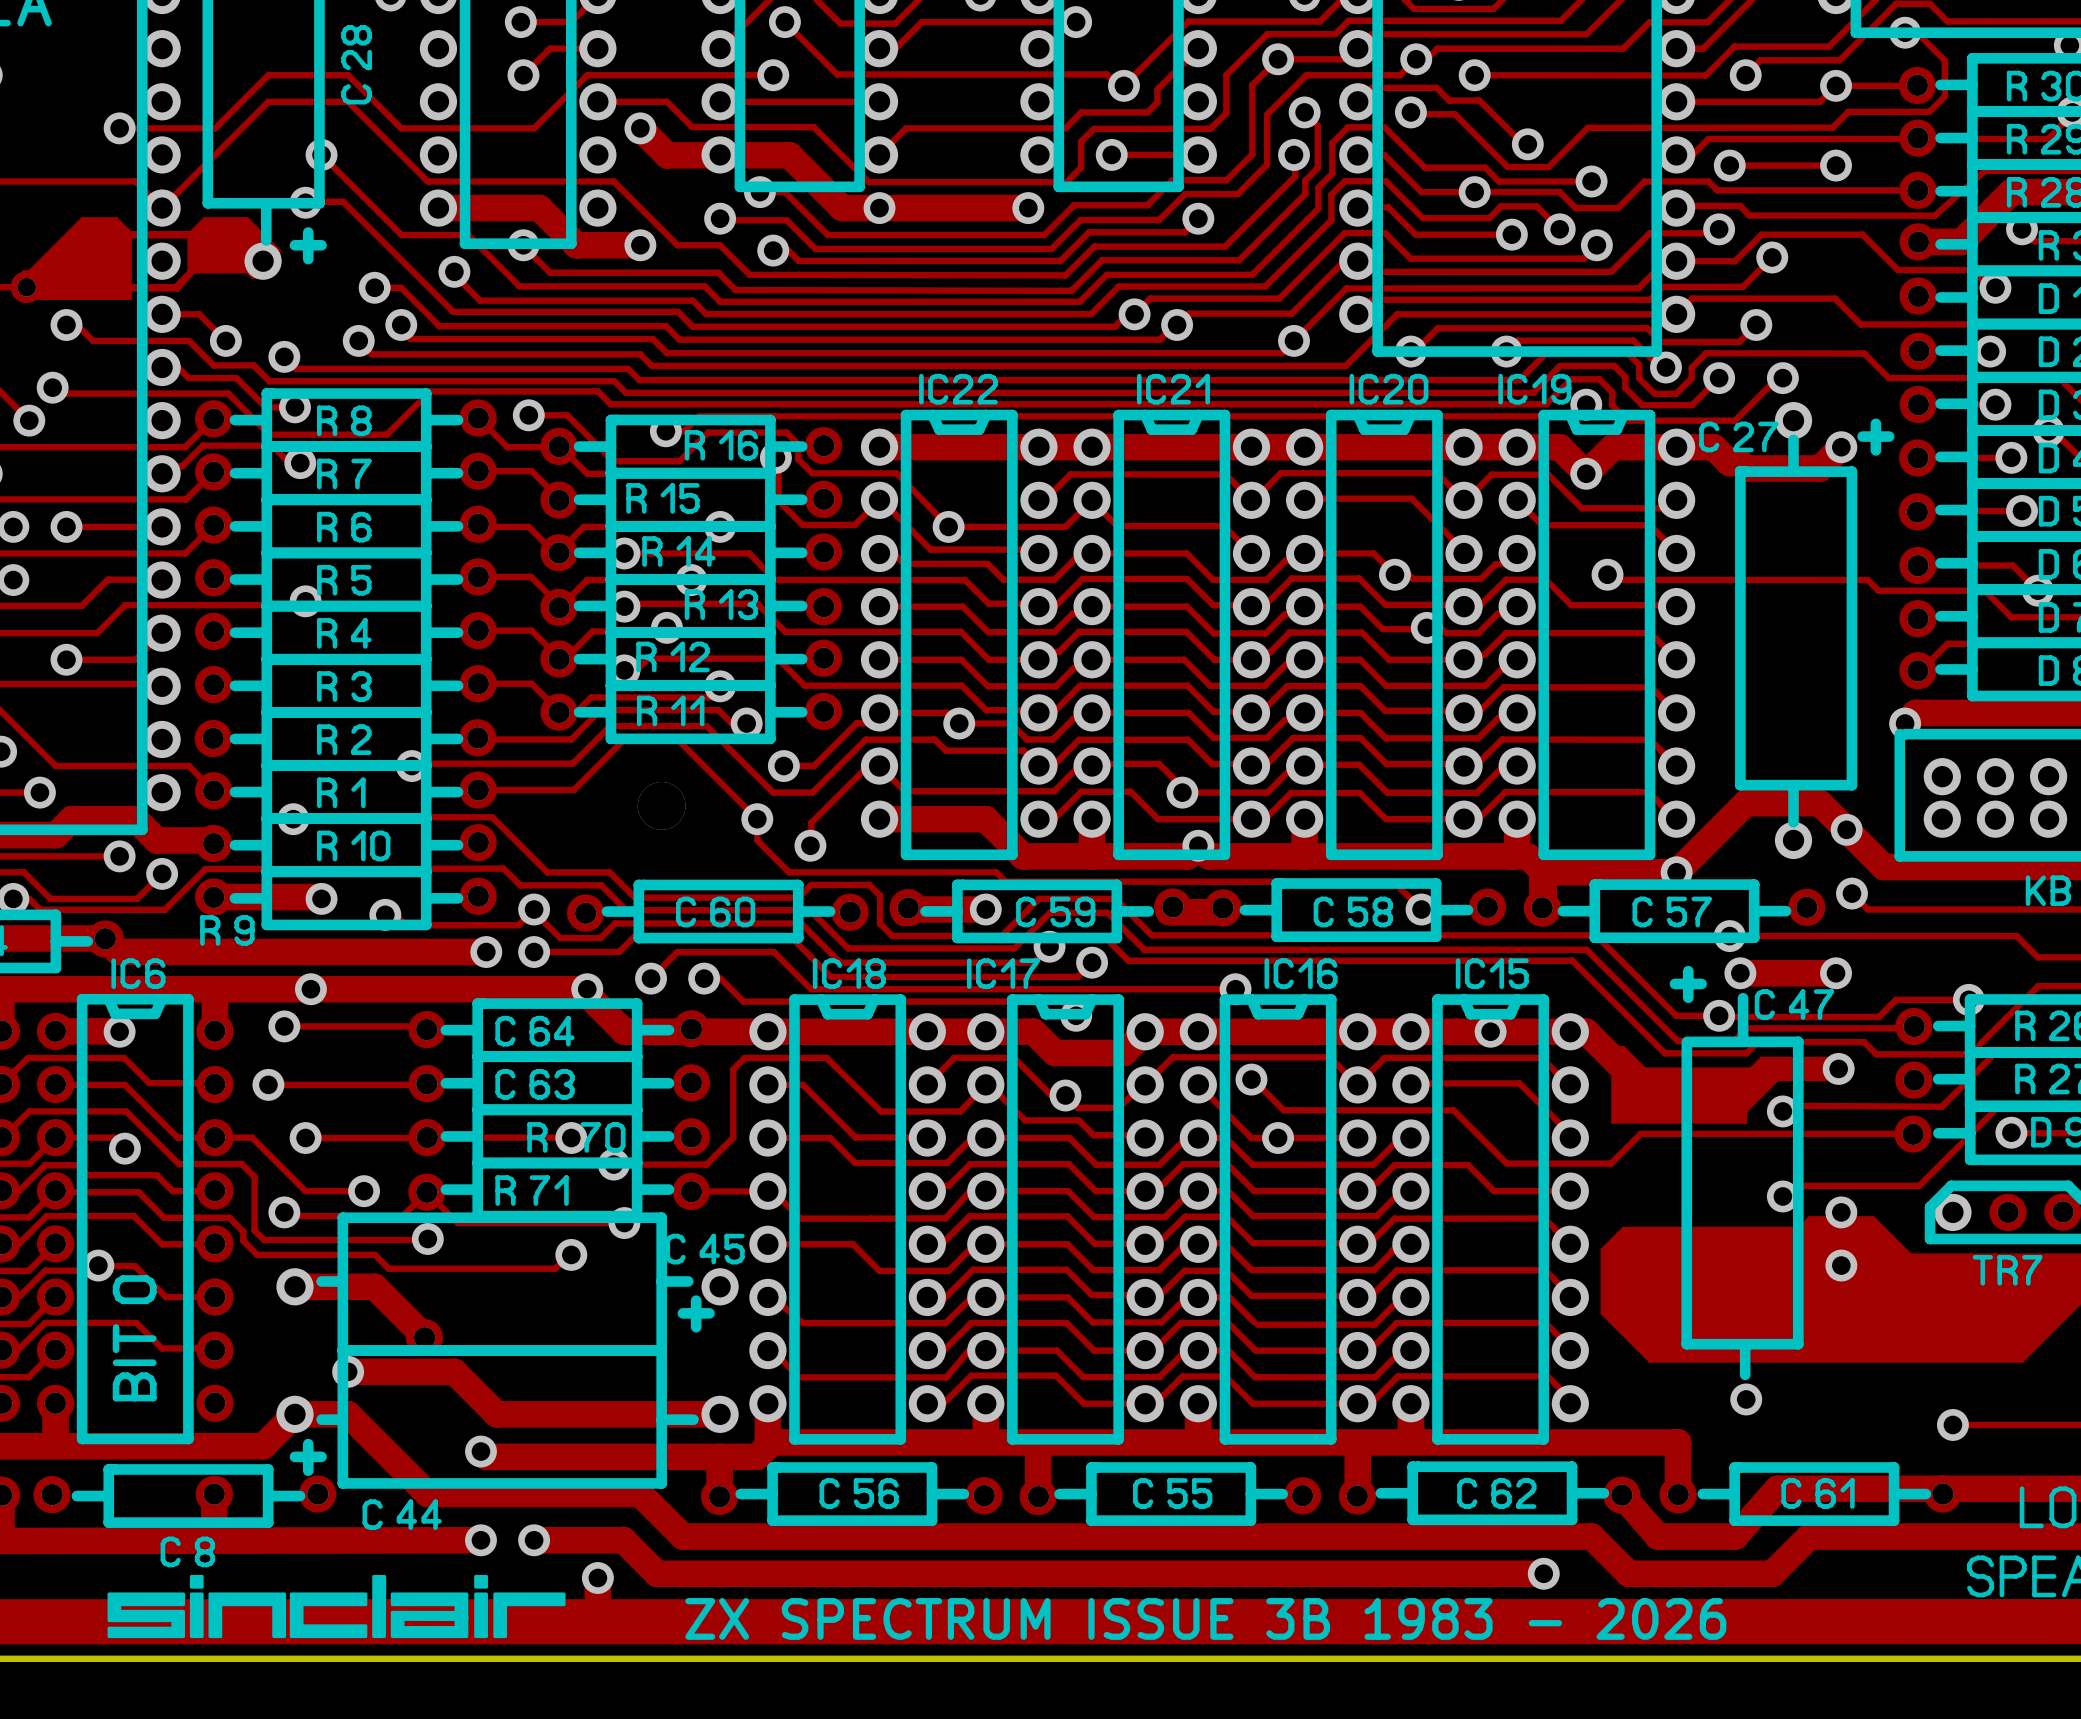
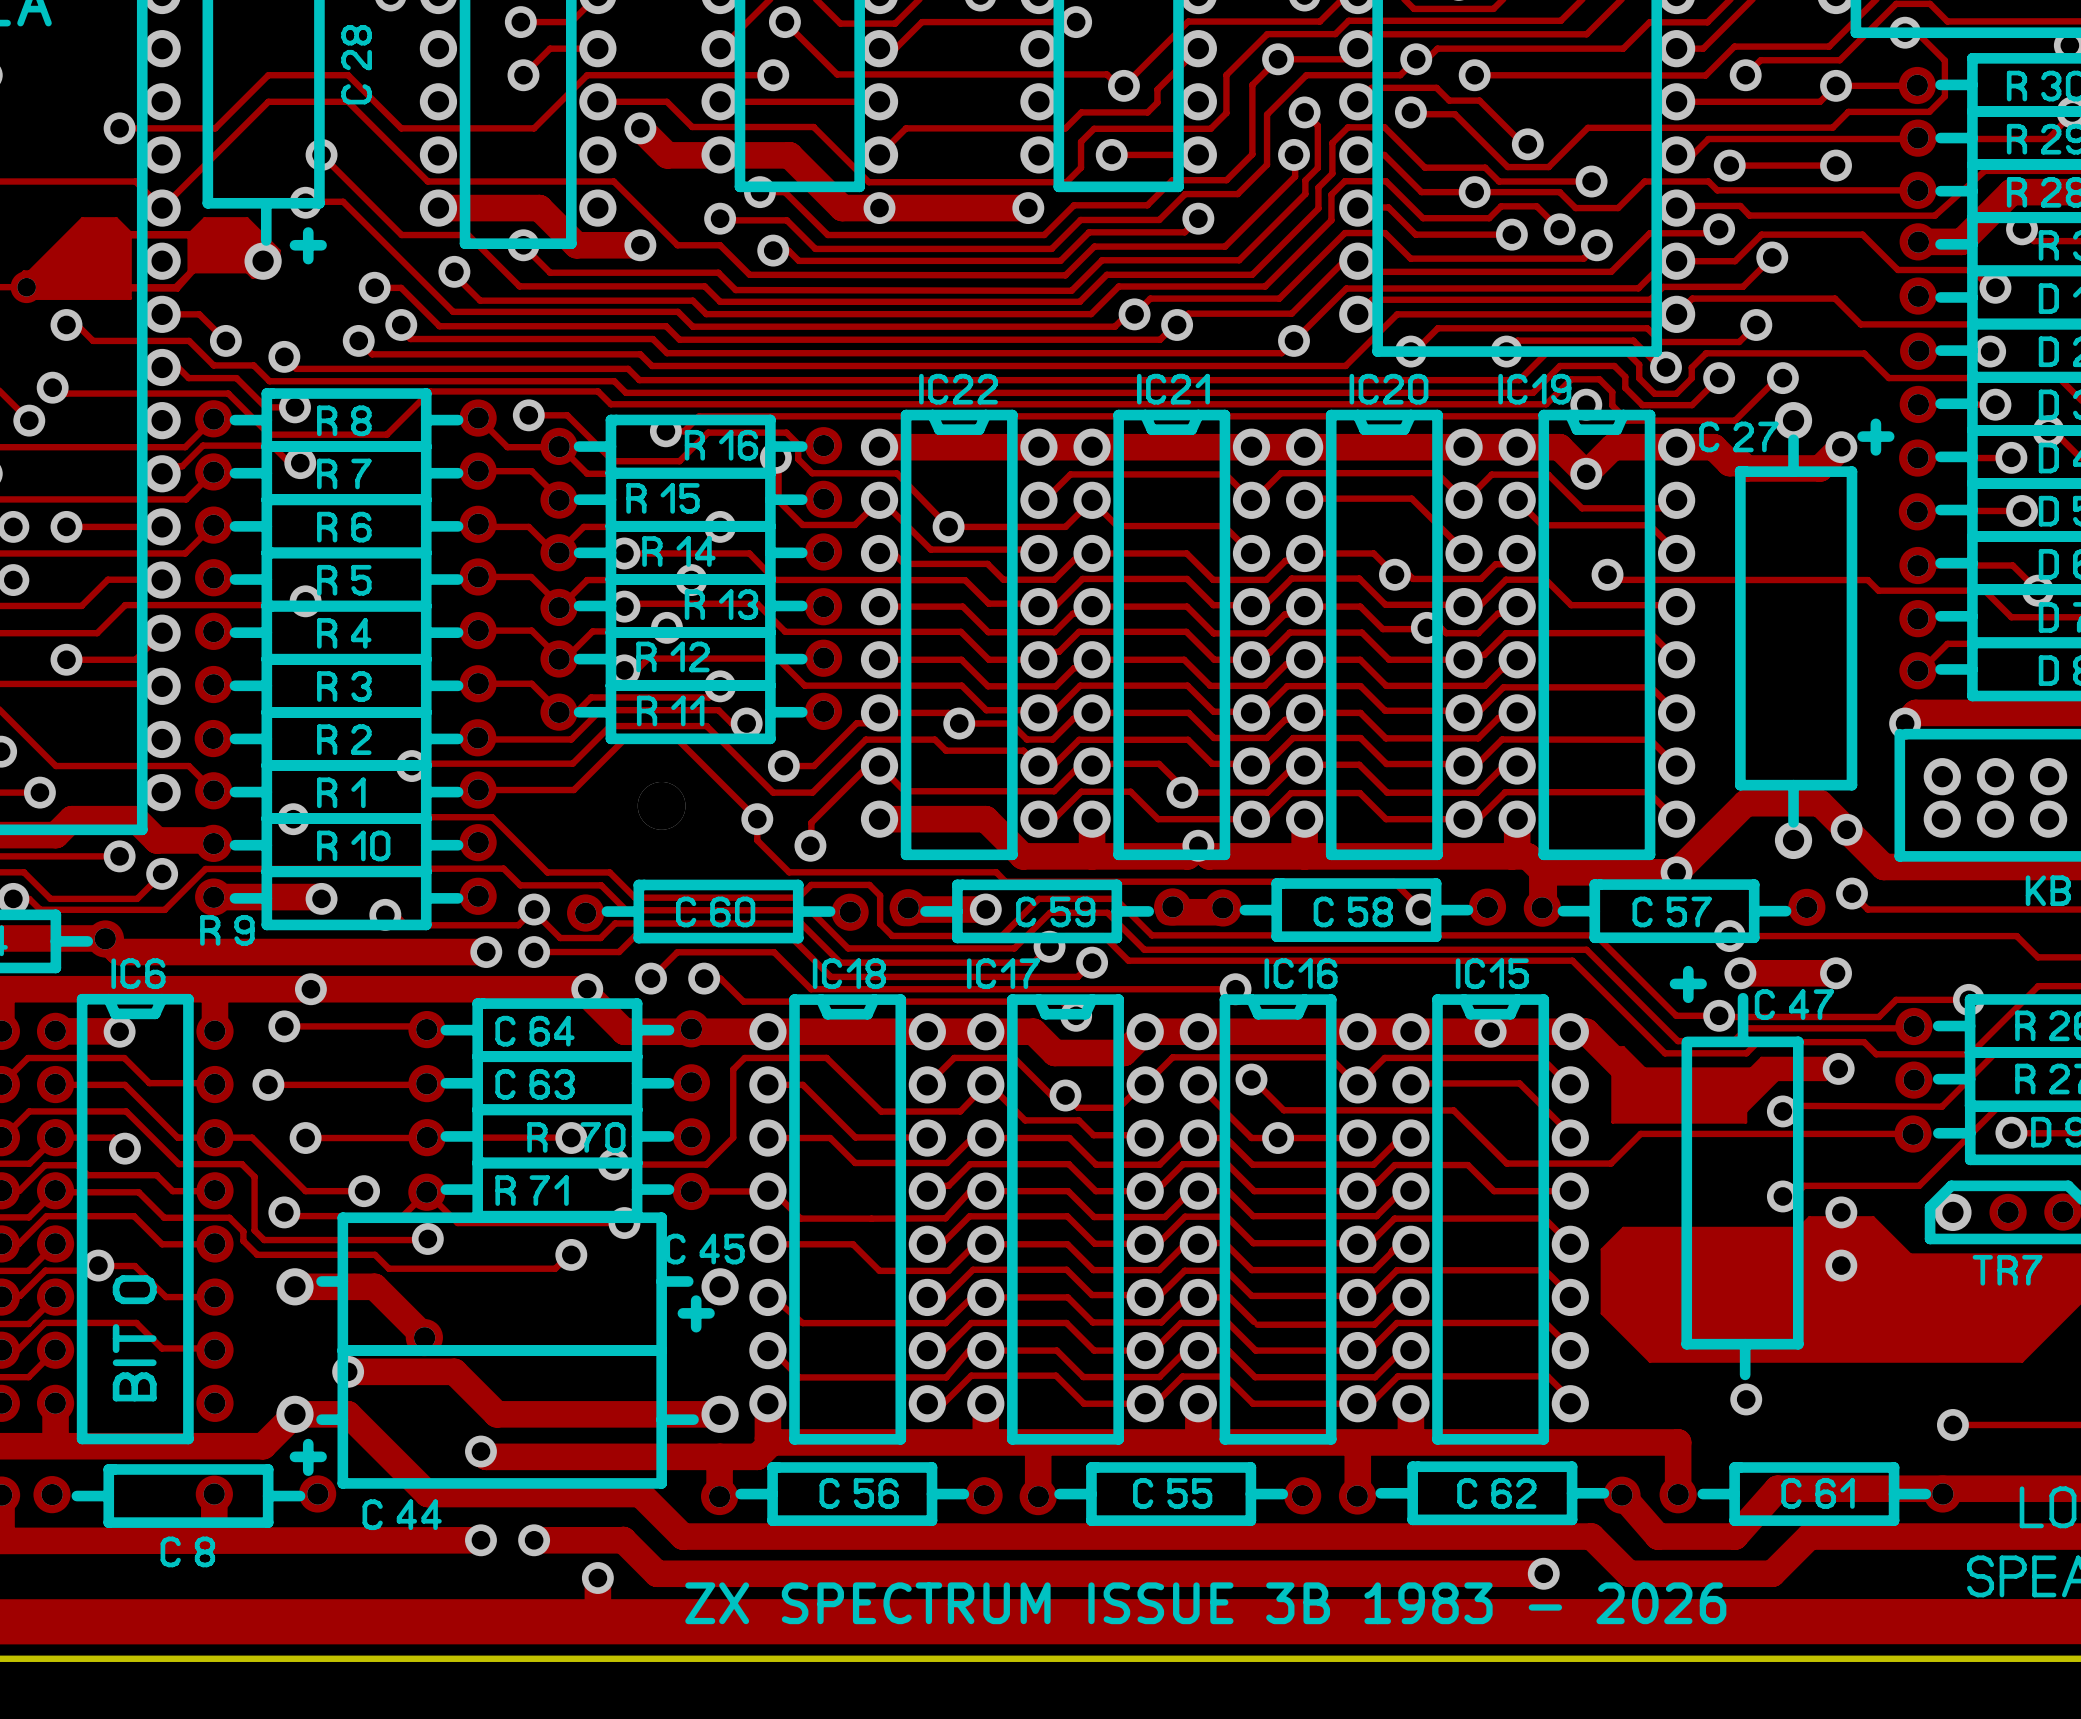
drawing: [107, 1574, 566, 1639] -> none
text position: ZX SPECTRUM ISSUE 3B 1983 - 2026 (1205, 1618) -> ZX SPECTRUM ISSUE 3B 1983 - 2026 (1205, 1603)

